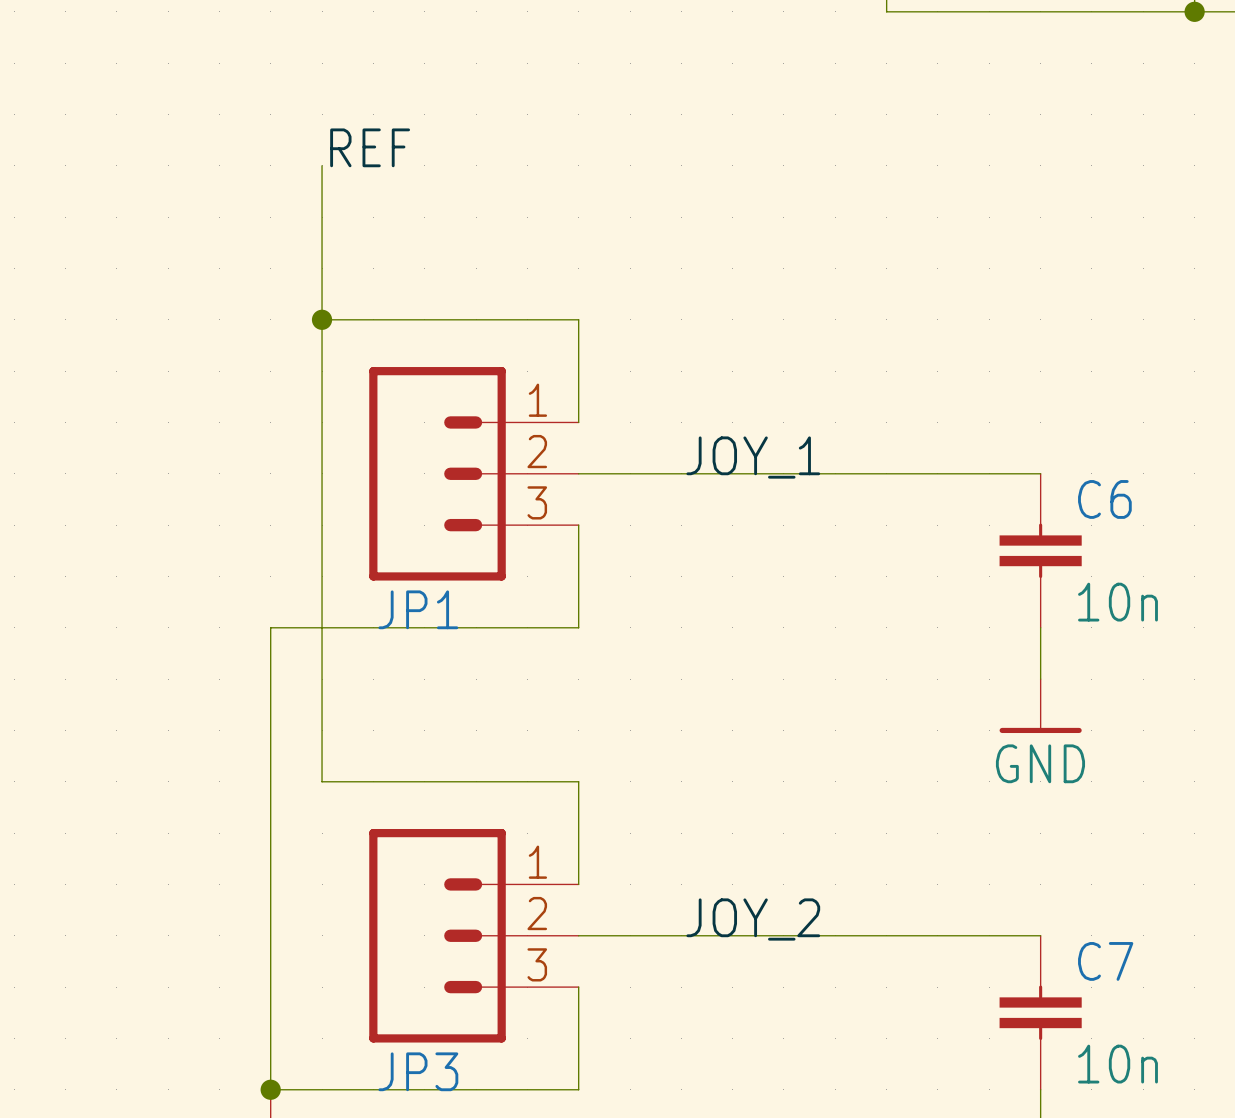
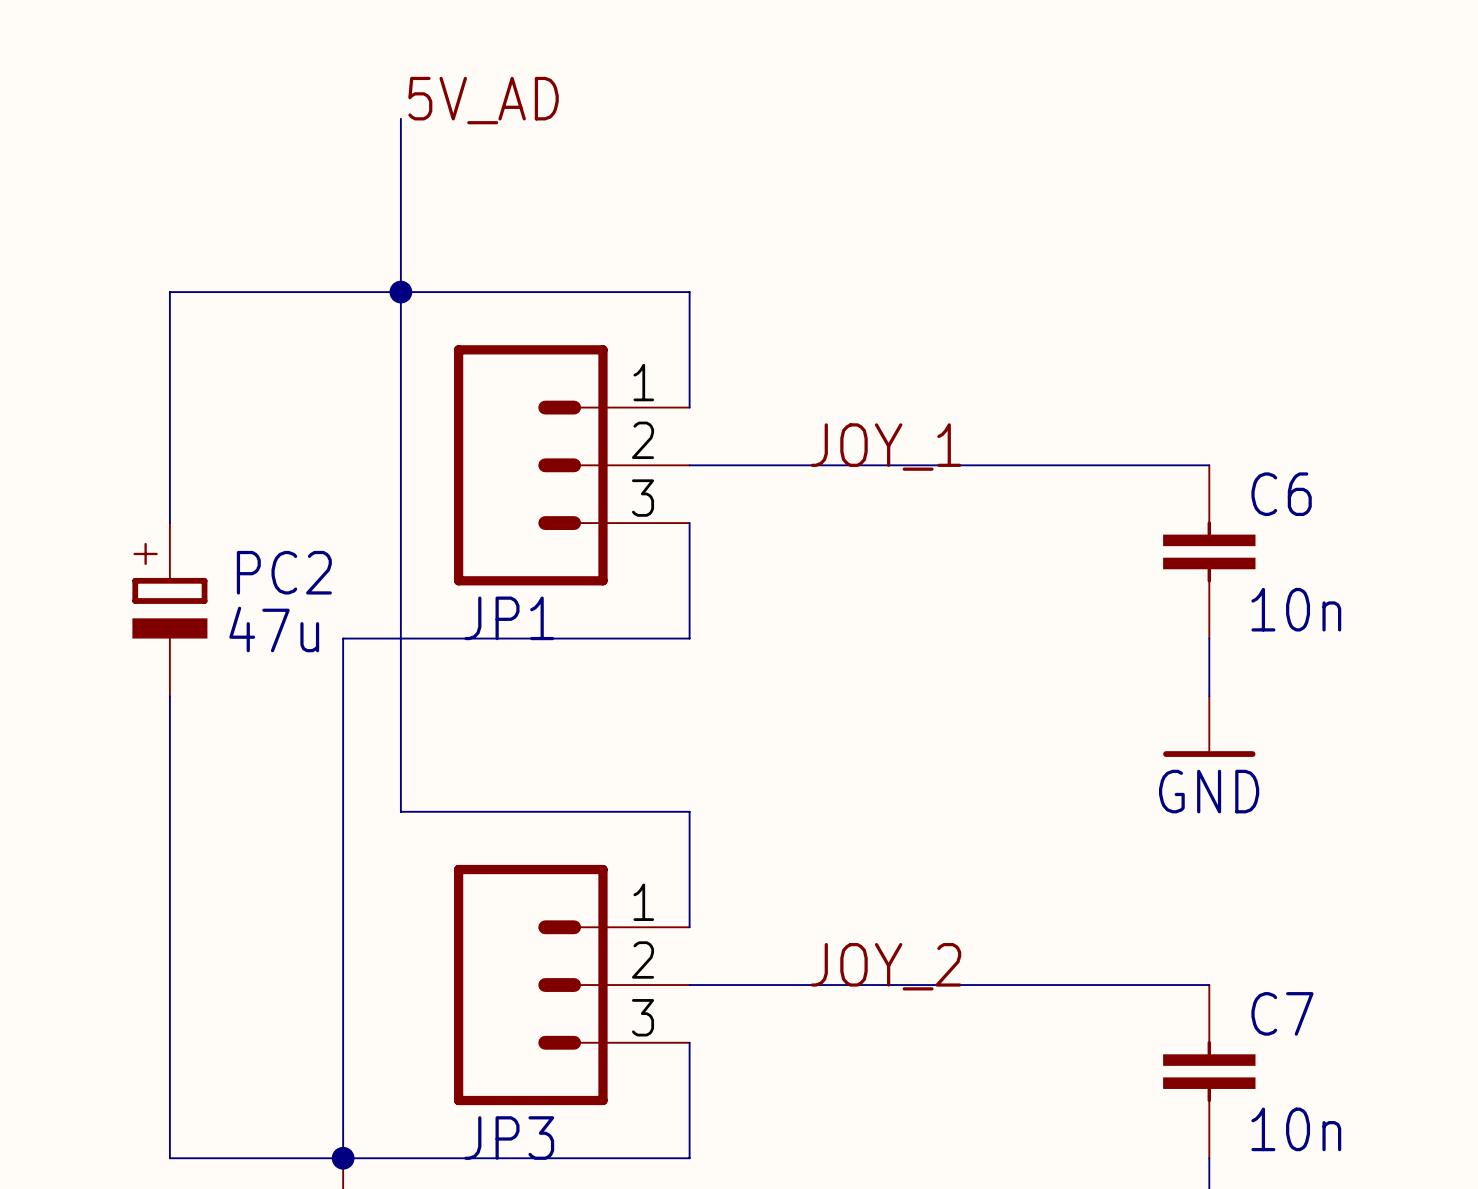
label: REF (370, 147) -> 5V_AD (483, 100)
wire: none -> (400, 292) (169, 292) (169, 523)
PC2: none -> 47u (169, 609)
wire: none -> (169, 696) (169, 1158) (343, 1158)

